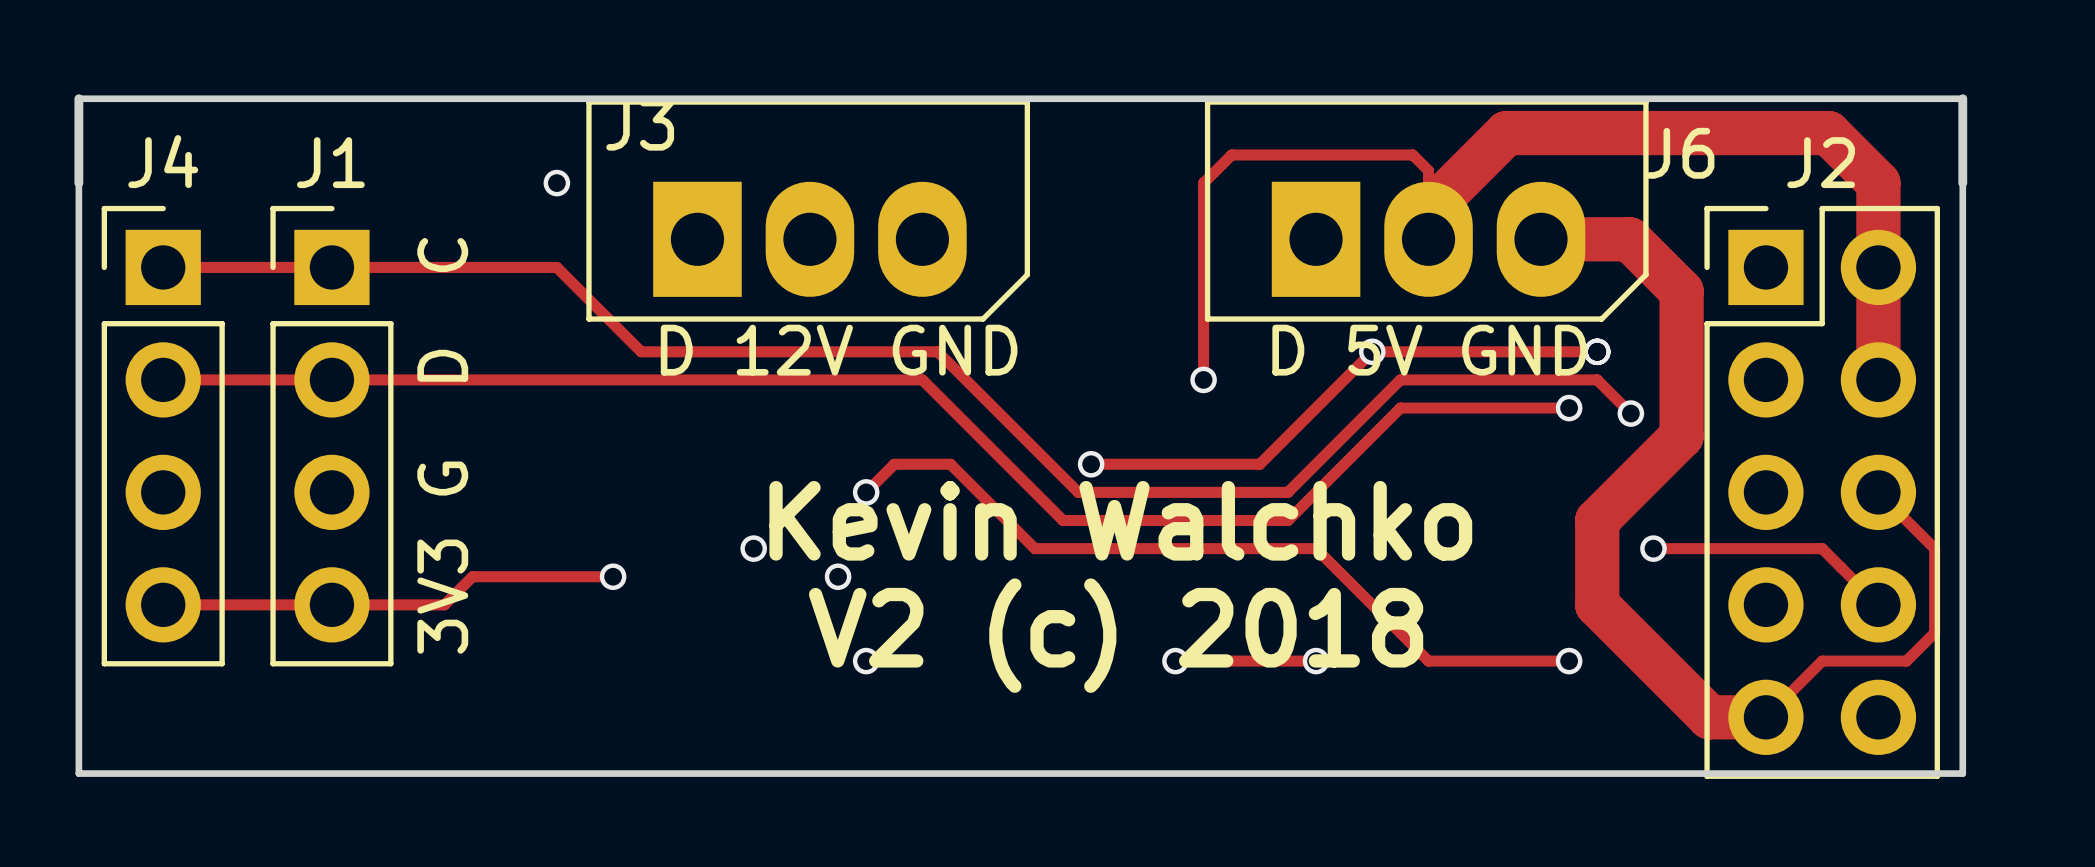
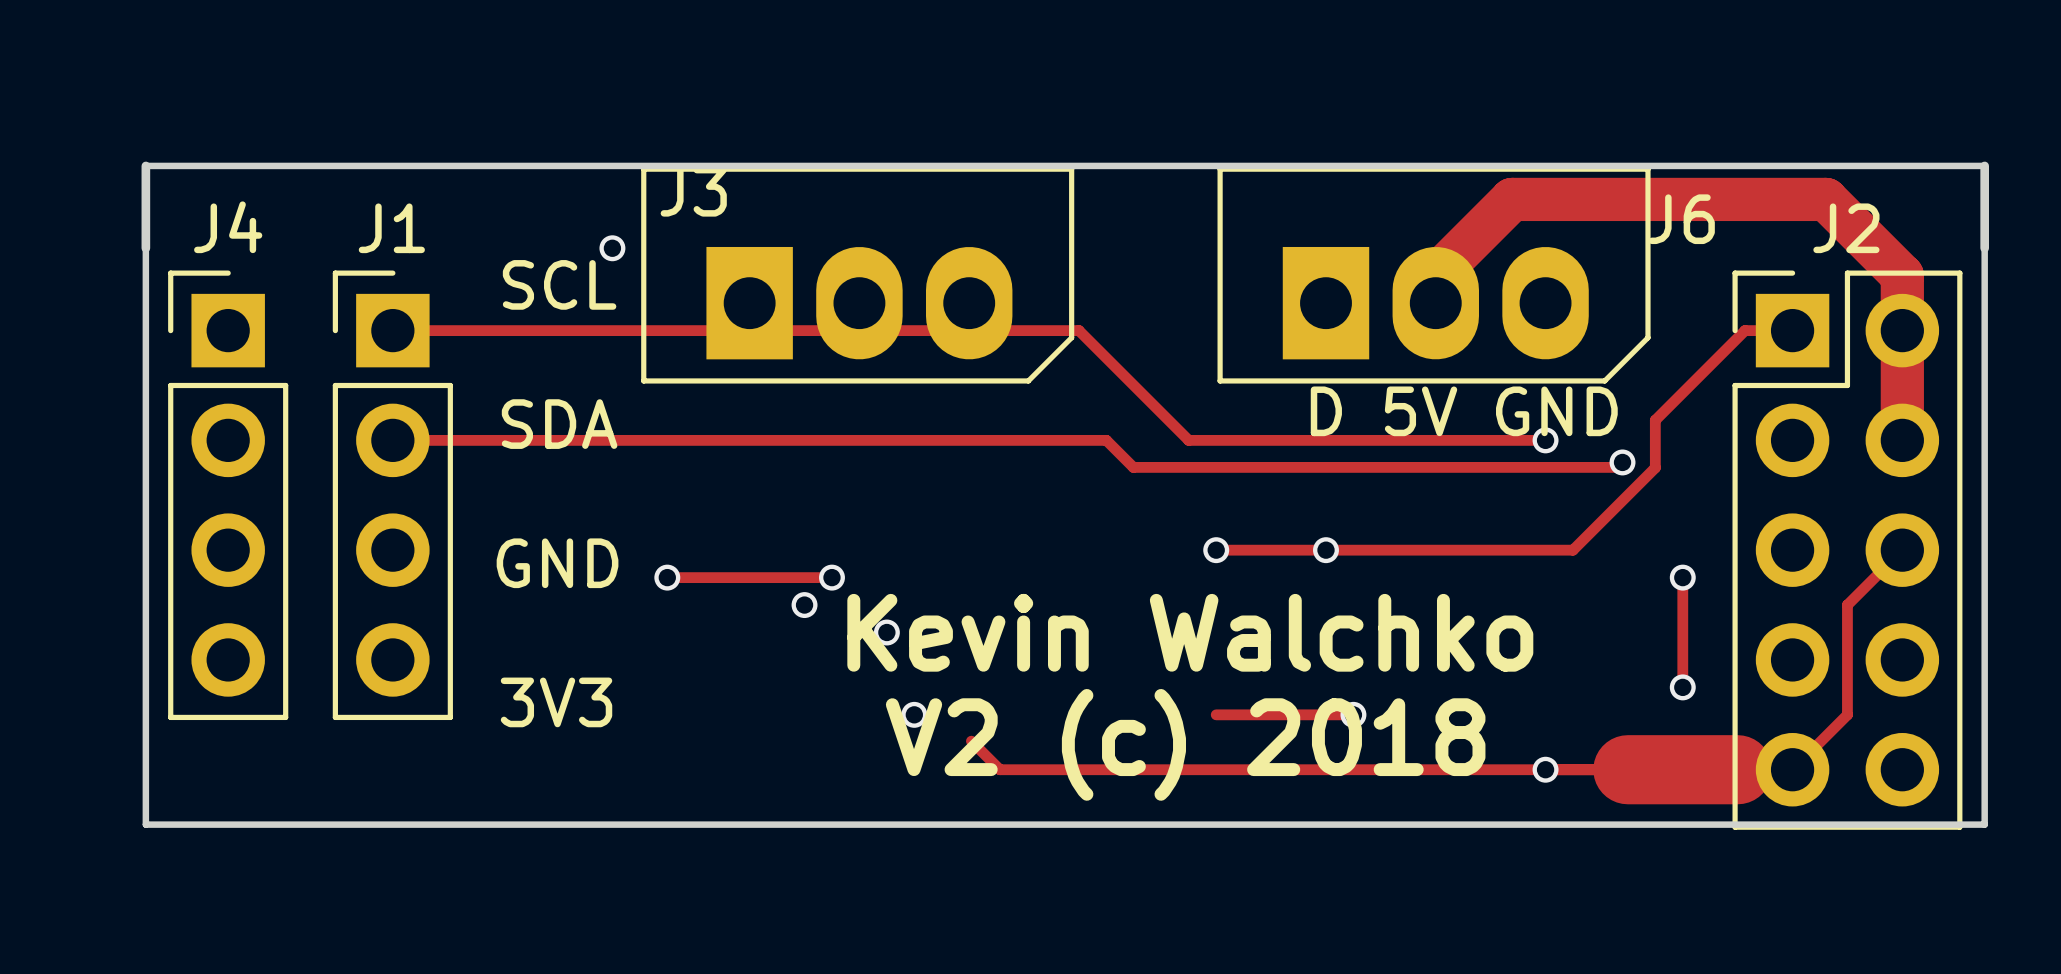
track: (1506, 133) (1428, 211) (1428, 239) (1428, 170) (1412, 154) (1231, 154) (1203, 183) (1203, 379) -> (1539, 199) (1512, 199) (1435, 275) (1435, 303)
track: (1800, 133) (1828, 133) (1878, 183) (1878, 211) -> (1826, 199) (1902, 275)
J6 position: (1426, 210) -> (1434, 275)
text: none -> SCL (559, 284)
track: (1541, 239) (1629, 239) (1681, 291) (1681, 436) (1597, 520) (1597, 604) (1709, 717) -> (971, 741) (999, 769) (1737, 769)
track: (163, 267) (331, 267) -> none
track: (556, 267) (641, 351) (937, 351) (1078, 492) (1175, 492) -> (612, 330) (1078, 330) (1188, 440) (1435, 440)
text: D 12V GND (839, 350) -> none
via: (1372, 351) -> none
track: (1597, 351) (1372, 351) (1259, 464) (1091, 464) -> none
via: (1597, 351) -> none
text: none -> SDA (559, 424)
track: (163, 379) (331, 379) -> (667, 577) (831, 577)
track: (922, 379) (1063, 520) (1288, 520) (1400, 408) (1569, 408) -> (969, 440) (1106, 440) (1133, 467) (1617, 467) (1622, 462)
via: (1203, 379) -> none
track: (1400, 379) (1287, 492) -> (1792, 330) (1745, 330) (1655, 420) (1655, 467) (1573, 550) (1326, 550)
track: (1512, 379) (1597, 379) (1630, 413) -> none
via: none -> (1545, 440)
via position: (1569, 408) -> (1622, 462)
via: (1630, 413) -> none
text: 3V3 G D C (442, 445) -> none
via: (1091, 464) -> none
track: (866, 492) (894, 464) (950, 464) (1034, 548) (1316, 548) (1428, 661) (1569, 661) -> none
via: (866, 492) -> none
via: none -> (1216, 550)
via: none -> (1326, 550)
track: (1878, 492) (1934, 548) (1934, 632) (1906, 661) (1822, 661) -> (1902, 550) (1847, 605) (1847, 714)
text: none -> GND (557, 563)
via: none -> (831, 577)
text position: Kevin Walchko (1120, 520) -> Kevin Walchko (1190, 632)
track: none -> (1682, 577) (1682, 687)
track: (1653, 548) (1822, 548) (1878, 604) -> none
via position: (1653, 548) -> (1682, 577)
track: (613, 576) (472, 576) (444, 604) (163, 604) -> none
via position: (613, 576) -> (667, 577)
via: none -> (1682, 687)
text position: V2 (c) 2018 (1116, 635) -> V2 (c) 2018 (1185, 744)
text: none -> 3V3 (556, 702)
via: (1175, 661) -> none
via: (1569, 661) -> none
via: none -> (1545, 769)

